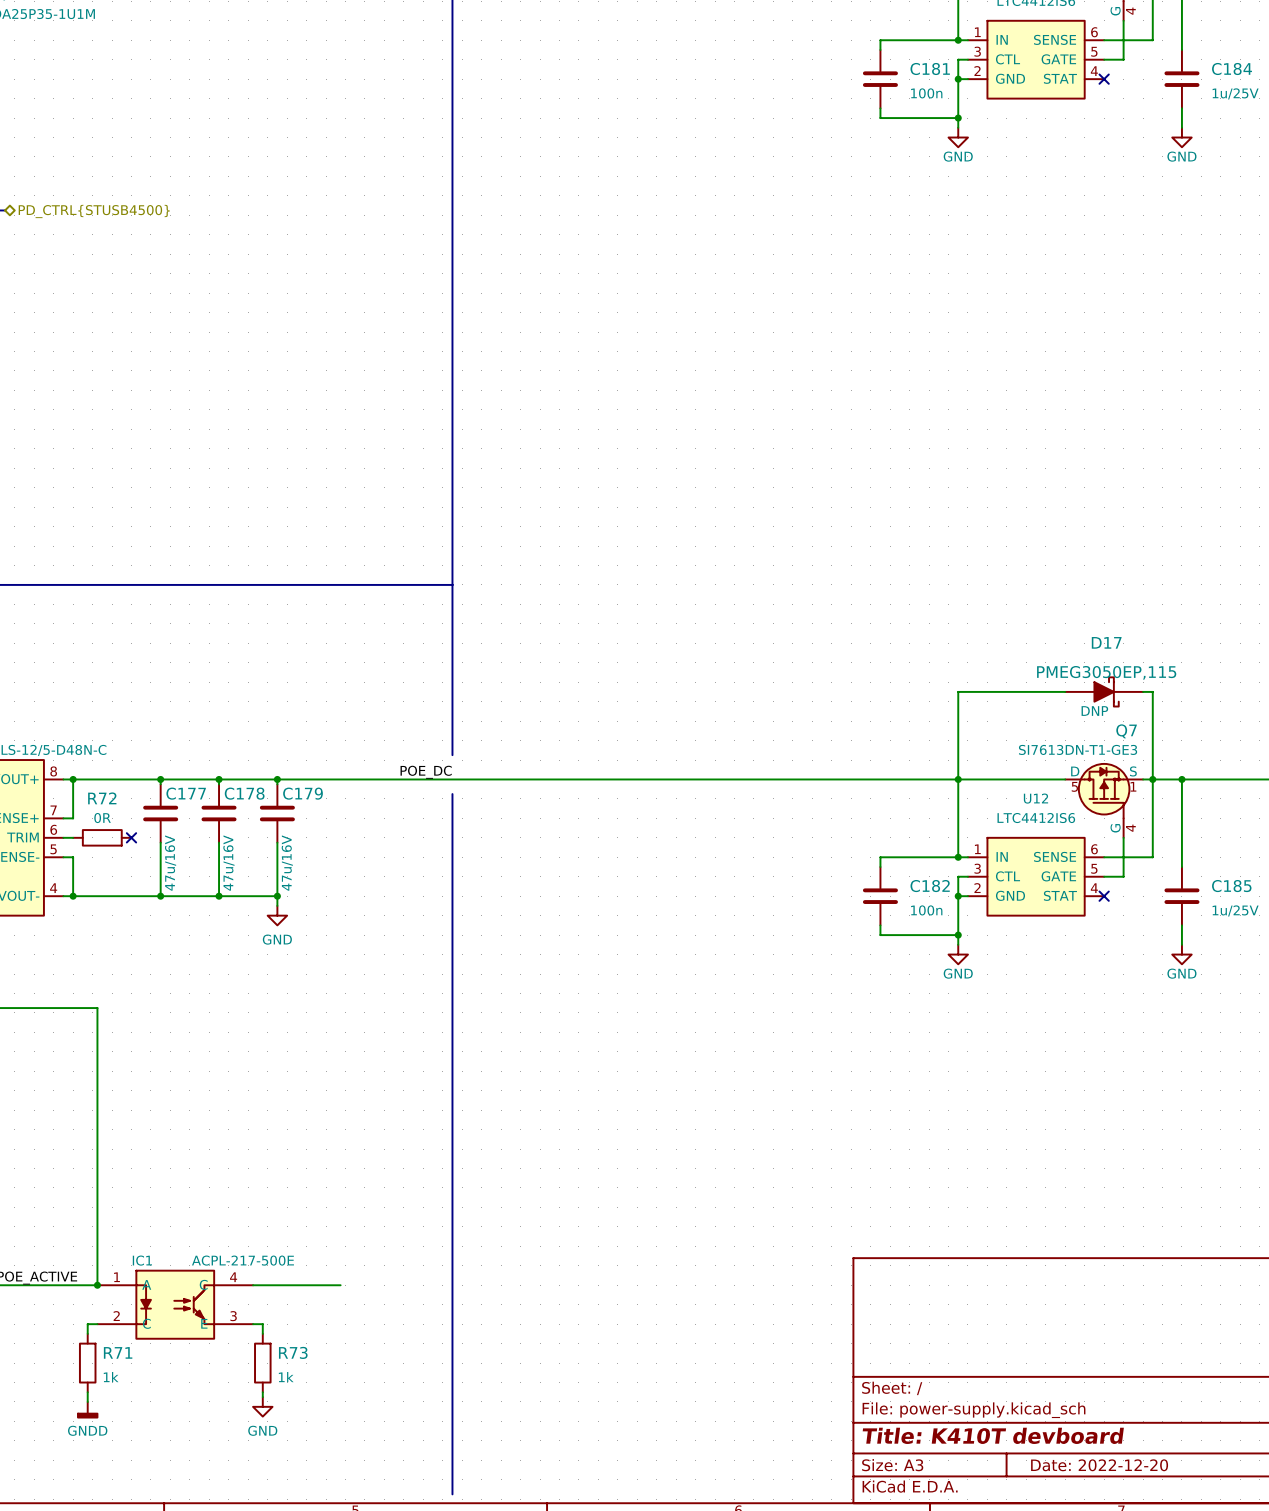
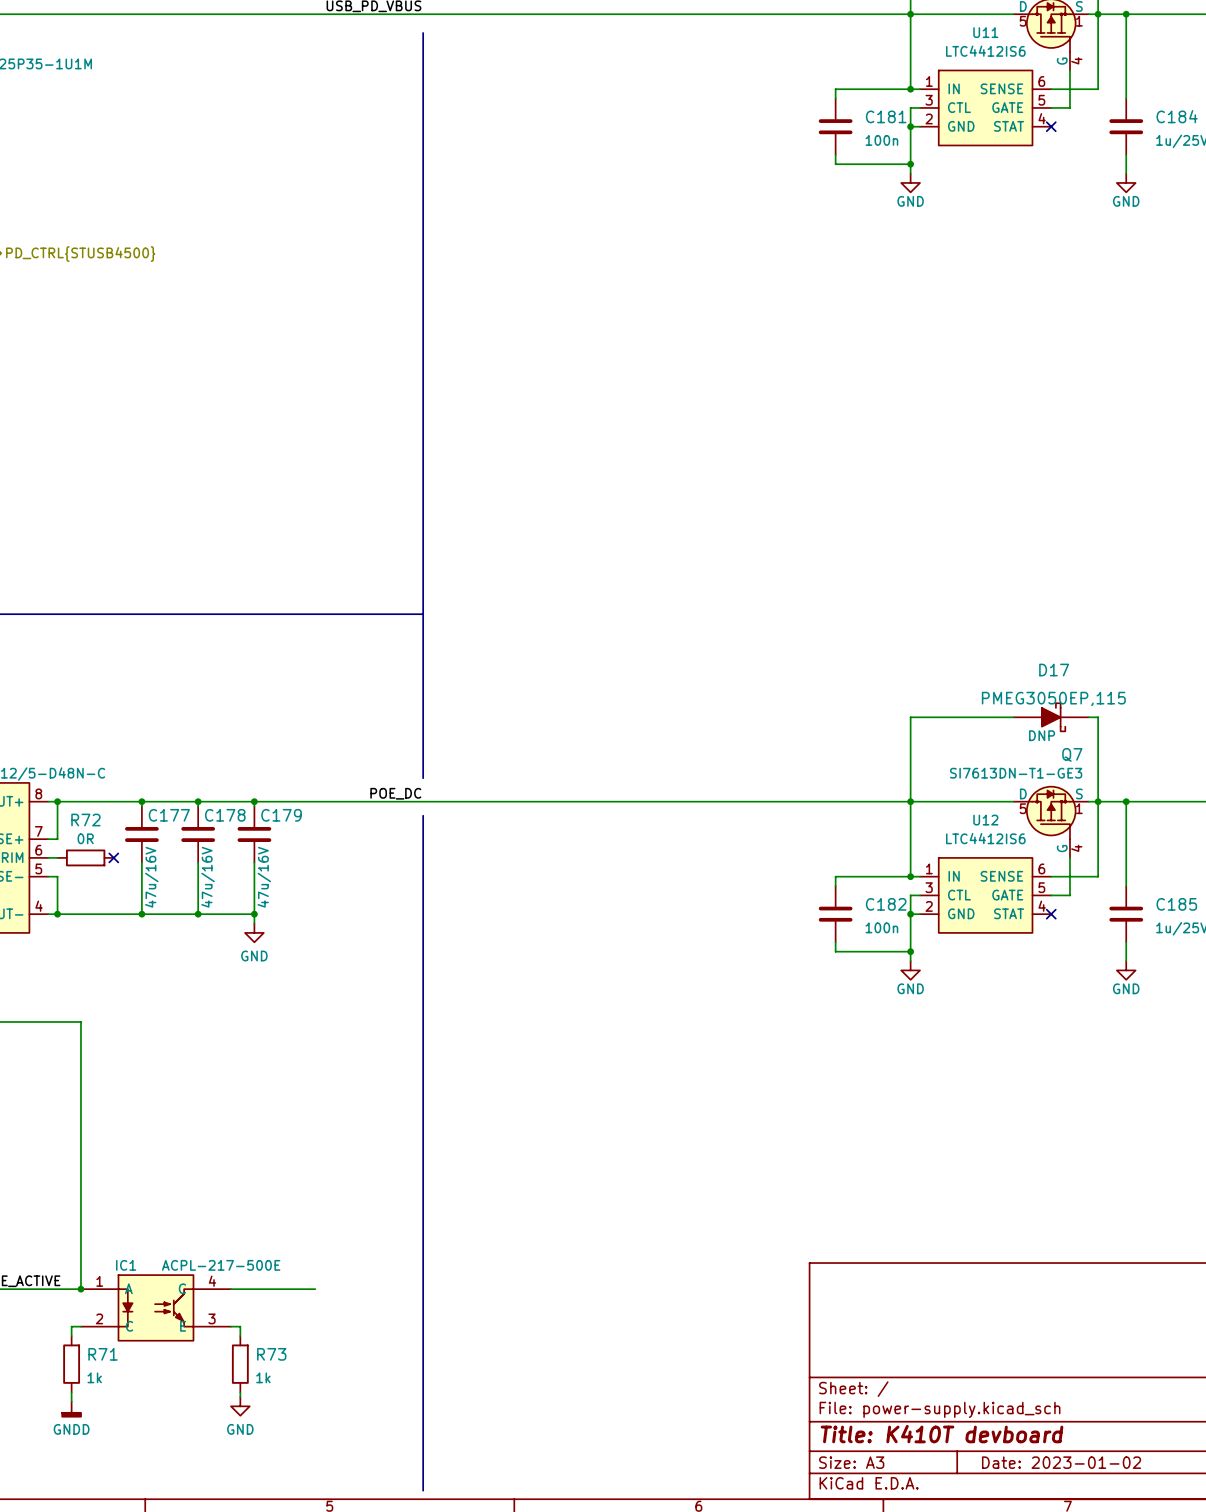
title block: Date: 2022-12-20 (1099, 1465) -> Date: 2023-01-02 (1061, 1462)

